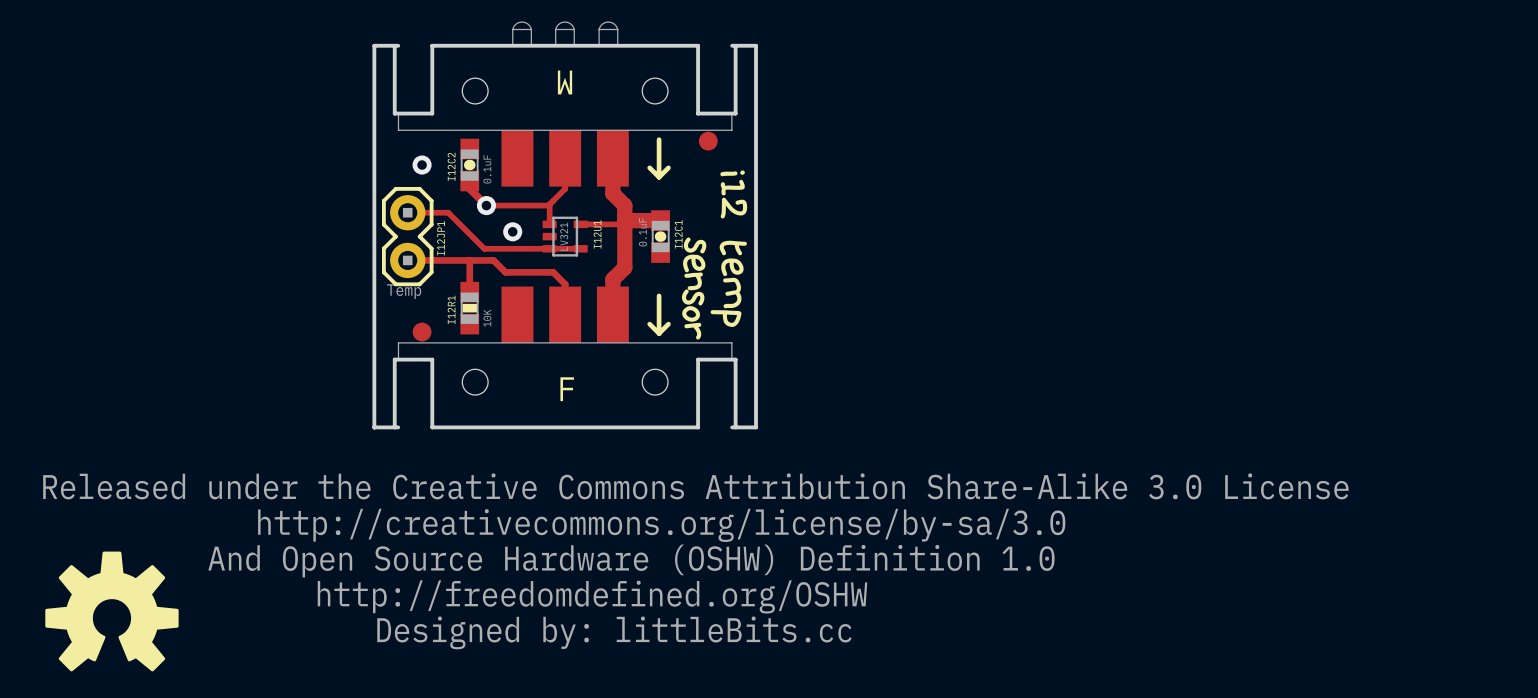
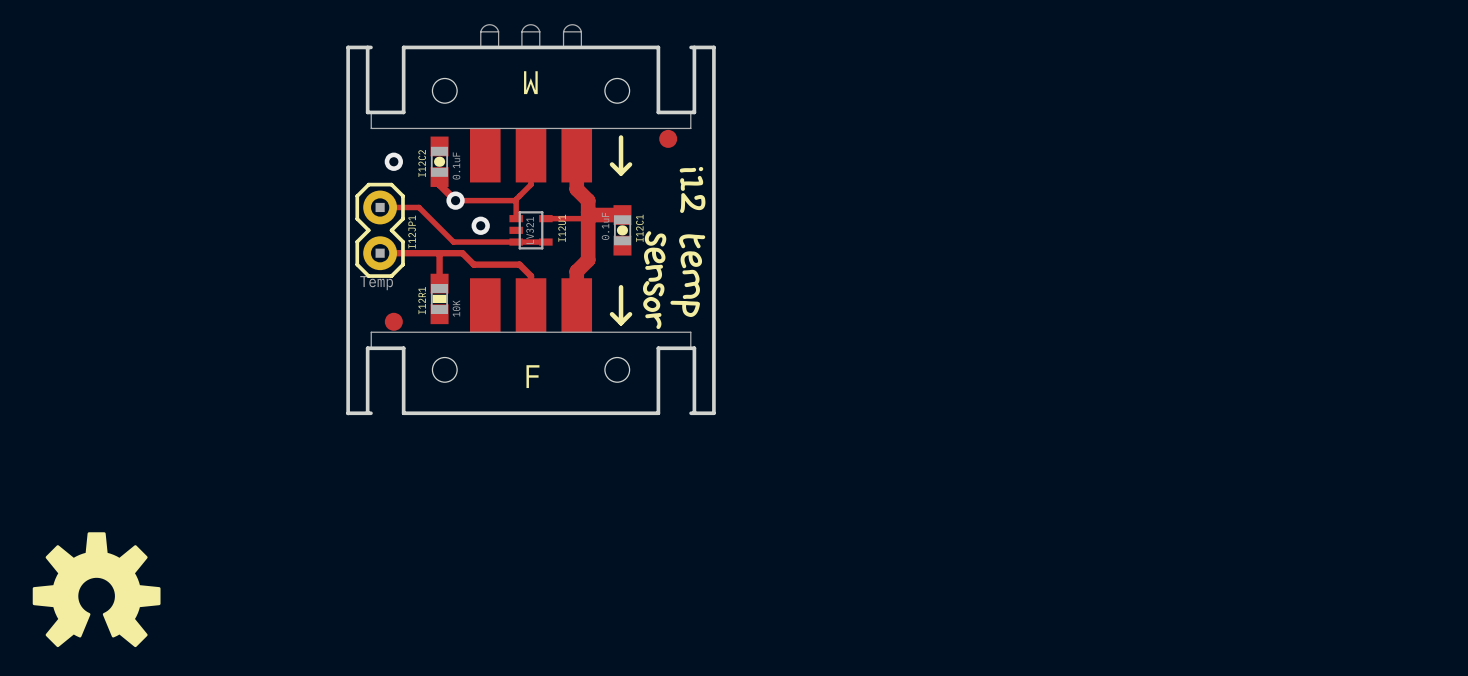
drawing: [43, 473, 1349, 650] -> none

